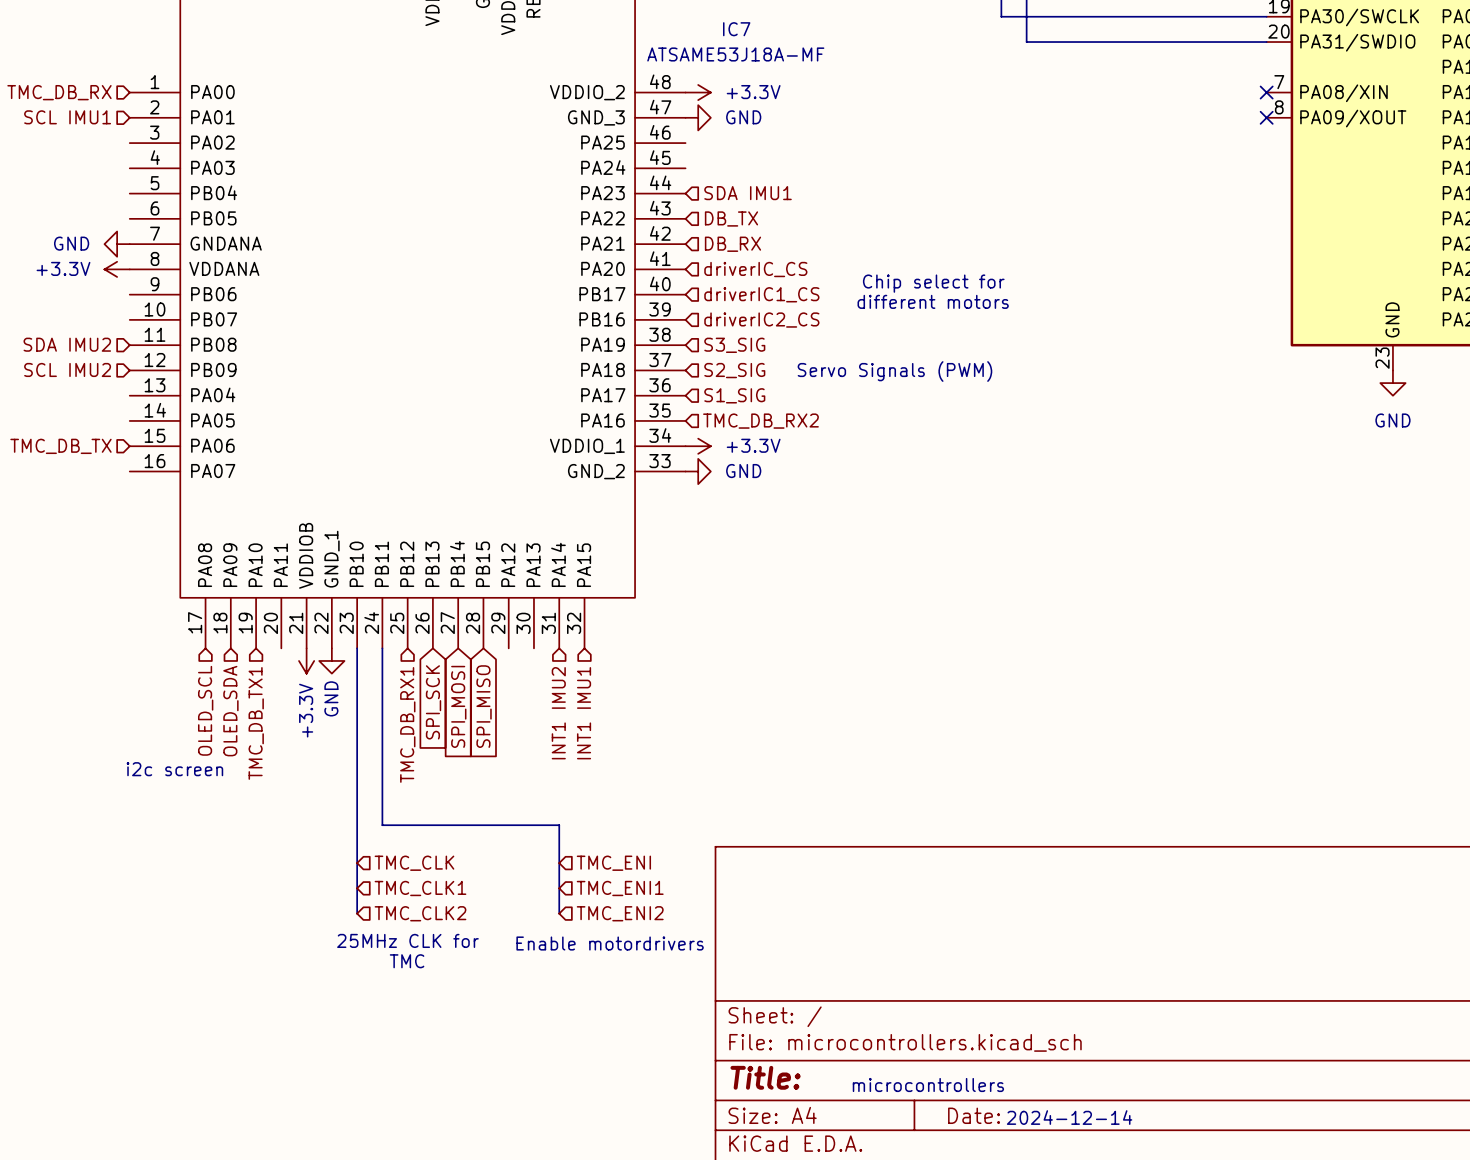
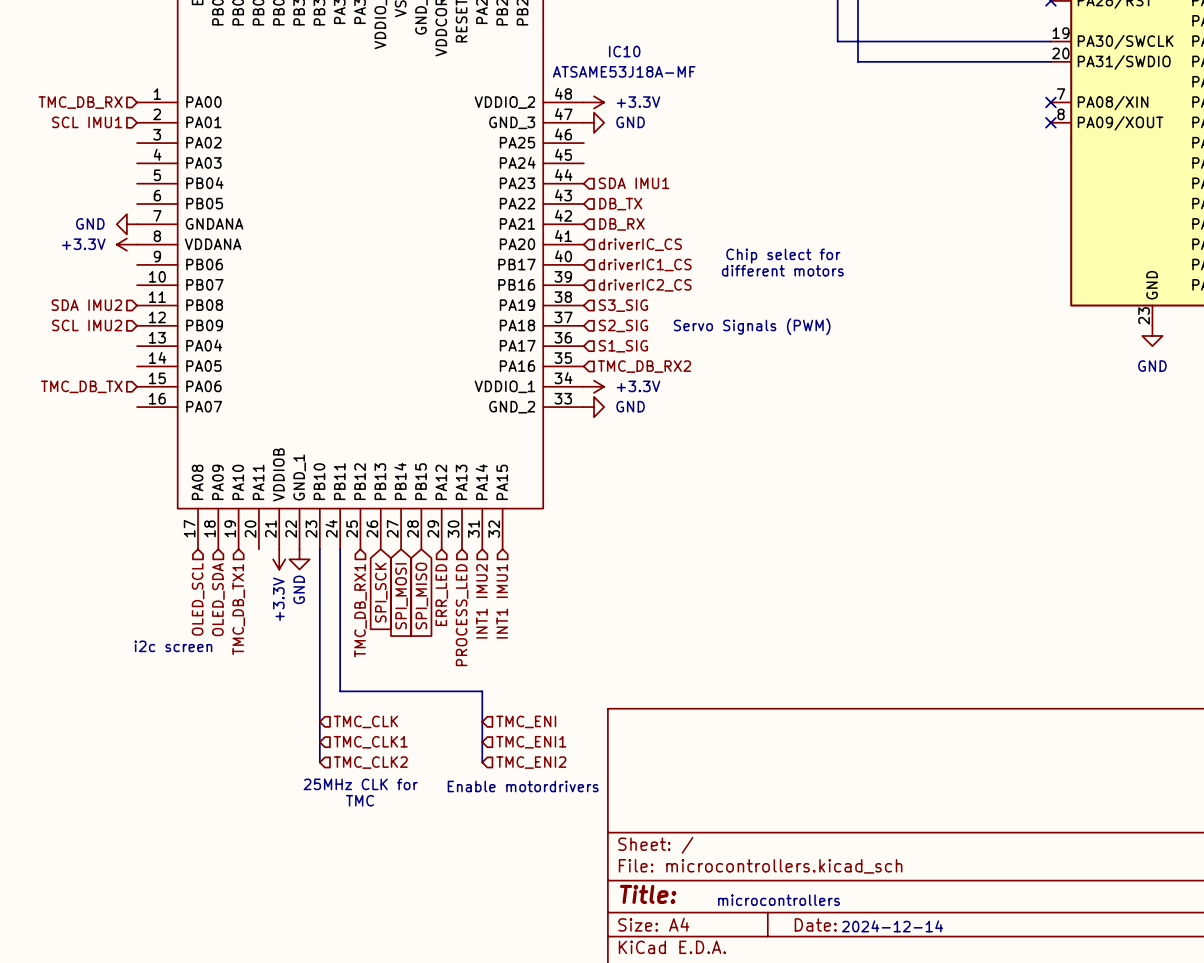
IC7 name: IC7 (736, 29) -> IC10 (624, 51)
hierarchical label: none -> ERR_LED (441, 595)
hierarchical label: none -> PROCESS_LED (462, 615)

